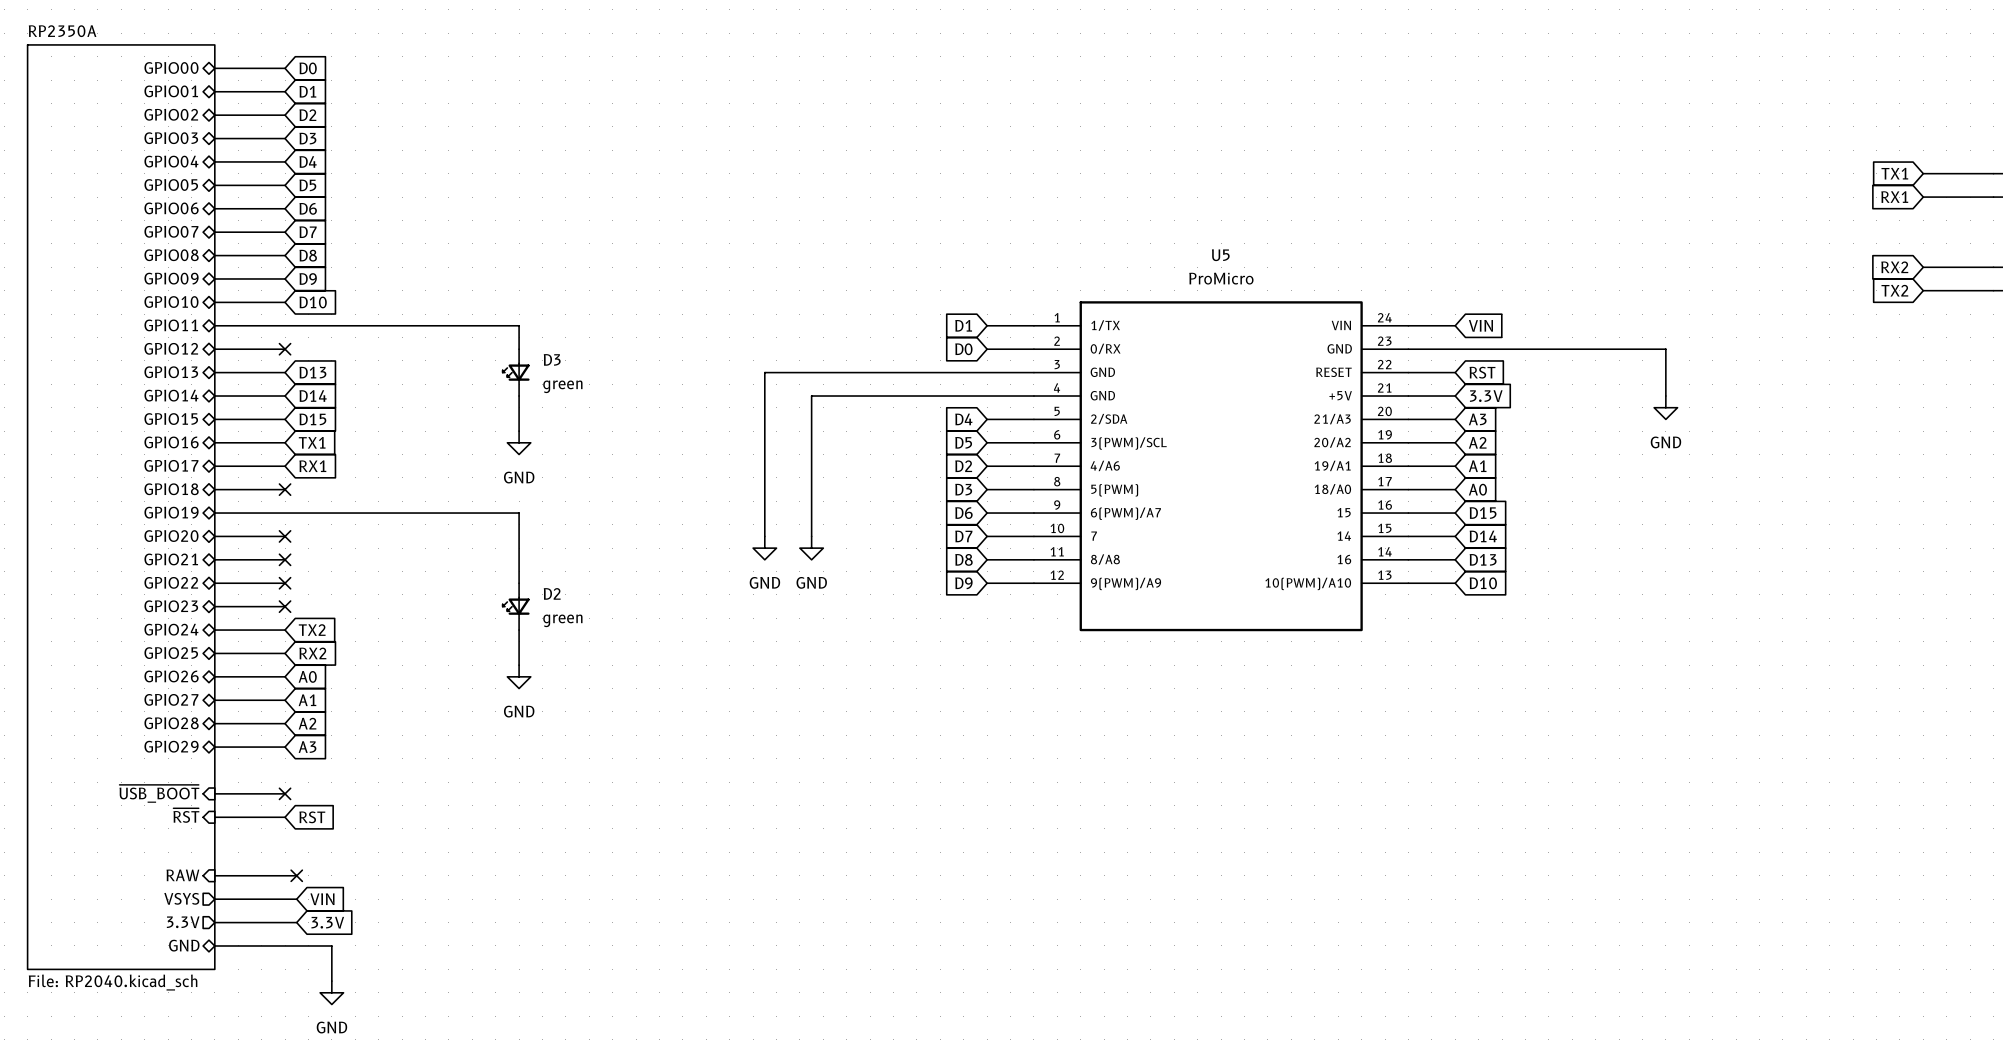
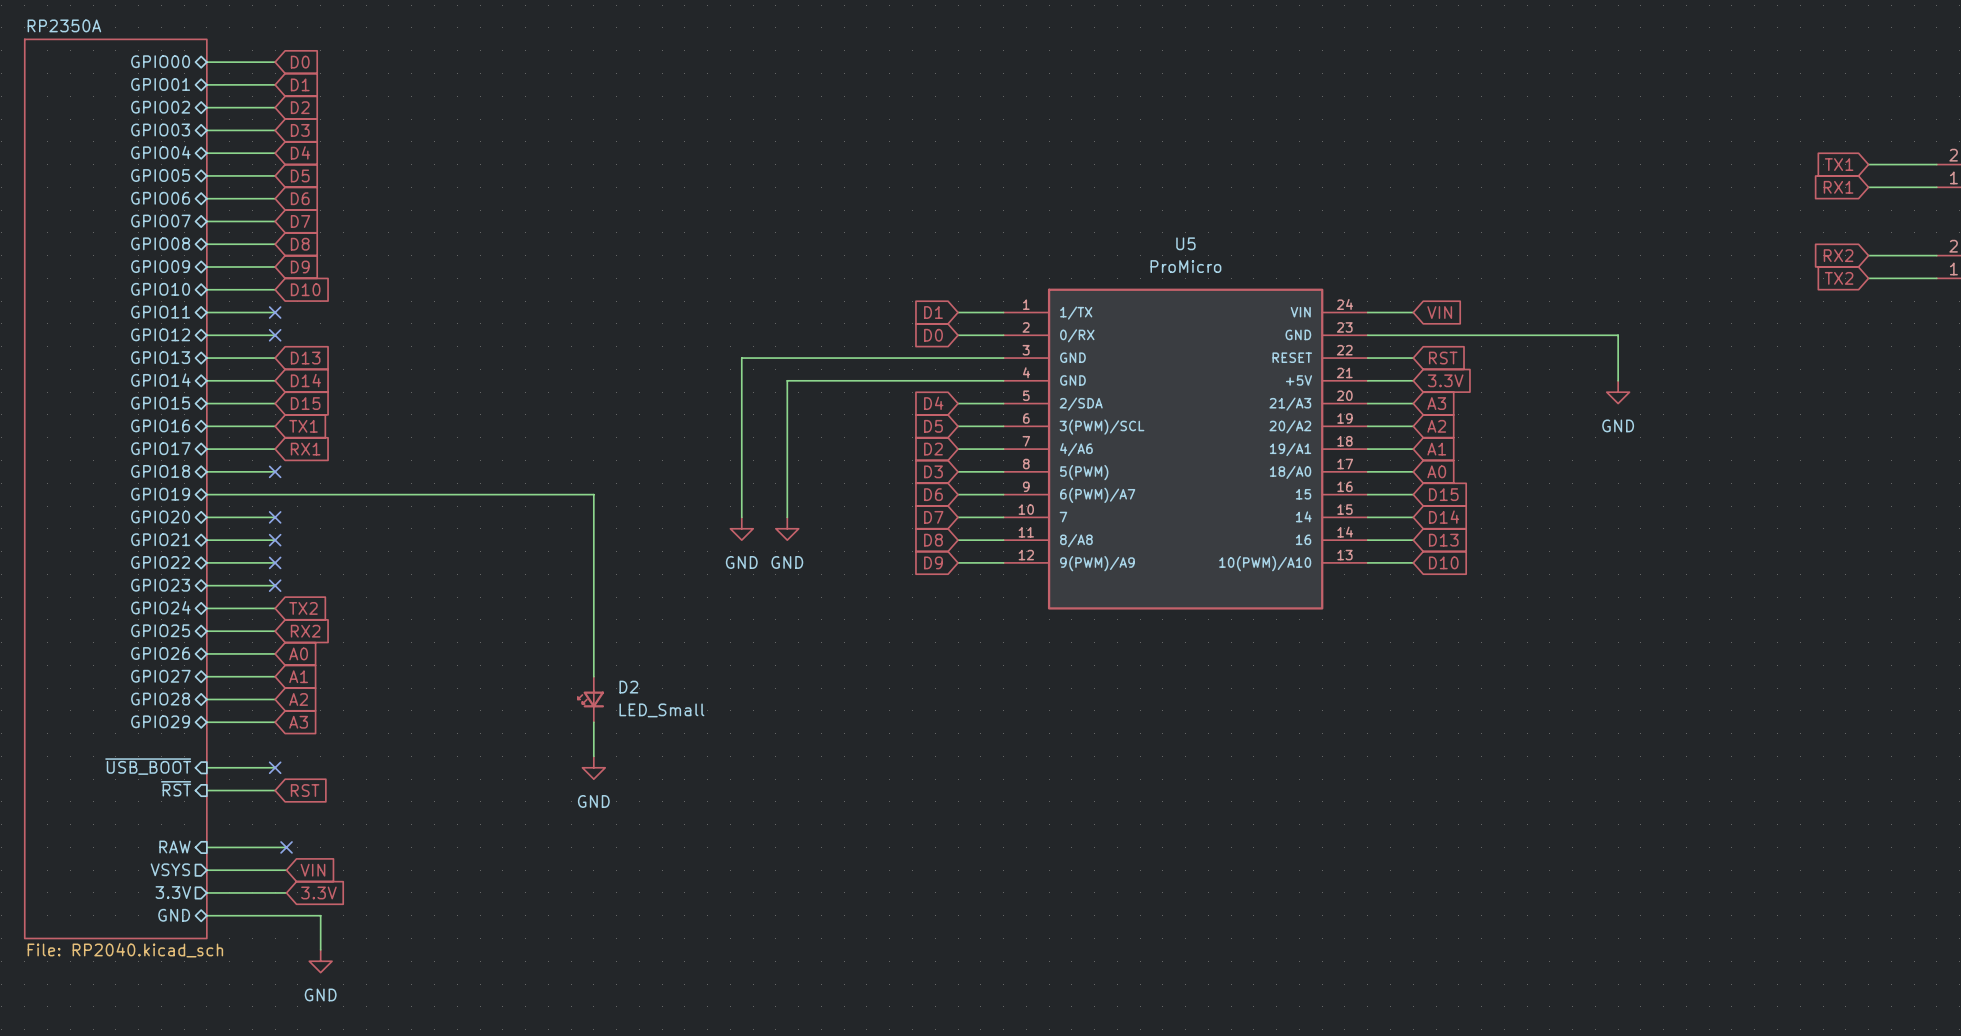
wire: (285, 325) (519, 325) (519, 349) -> none
no-connect mark: none -> (275, 312)
D3: green (516, 372) -> none
wire: (519, 396) (519, 431) -> none
power symbol: GND (519, 442) -> none
wire: (519, 513) (519, 583) -> (502, 494) (593, 494) (593, 676)
D2 position: (516, 606) -> (590, 699)
D2 value: green (562, 620) -> LED_Small (661, 710)
wire: (519, 630) (519, 665) -> (593, 722) (593, 756)
power symbol position: GND (519, 676) -> GND (593, 767)

